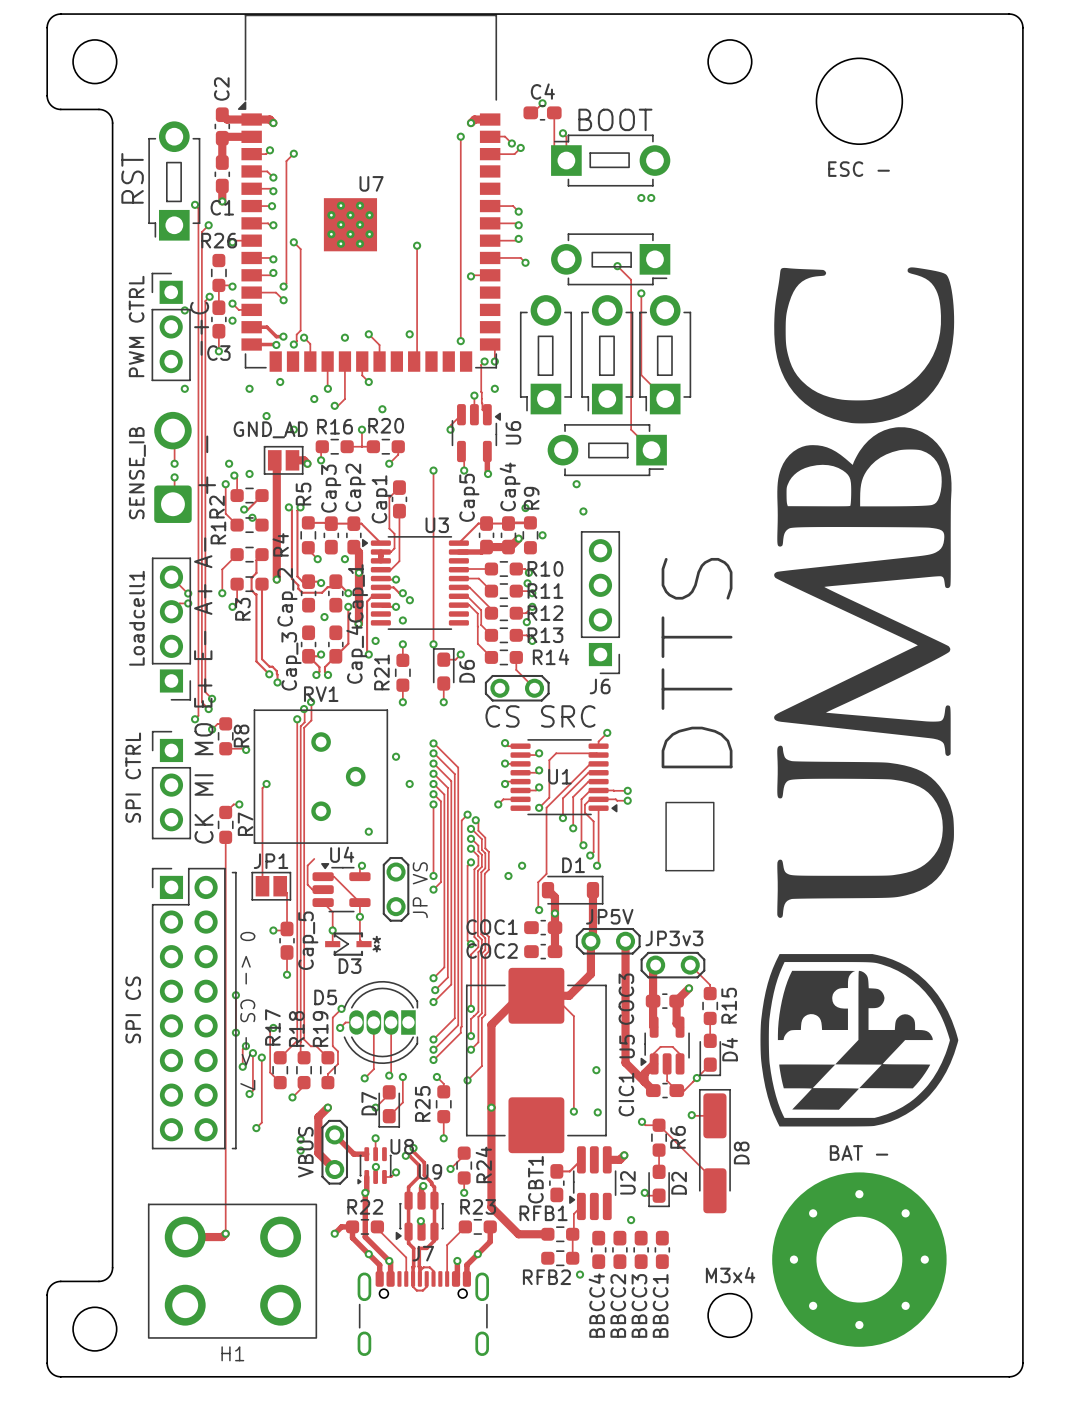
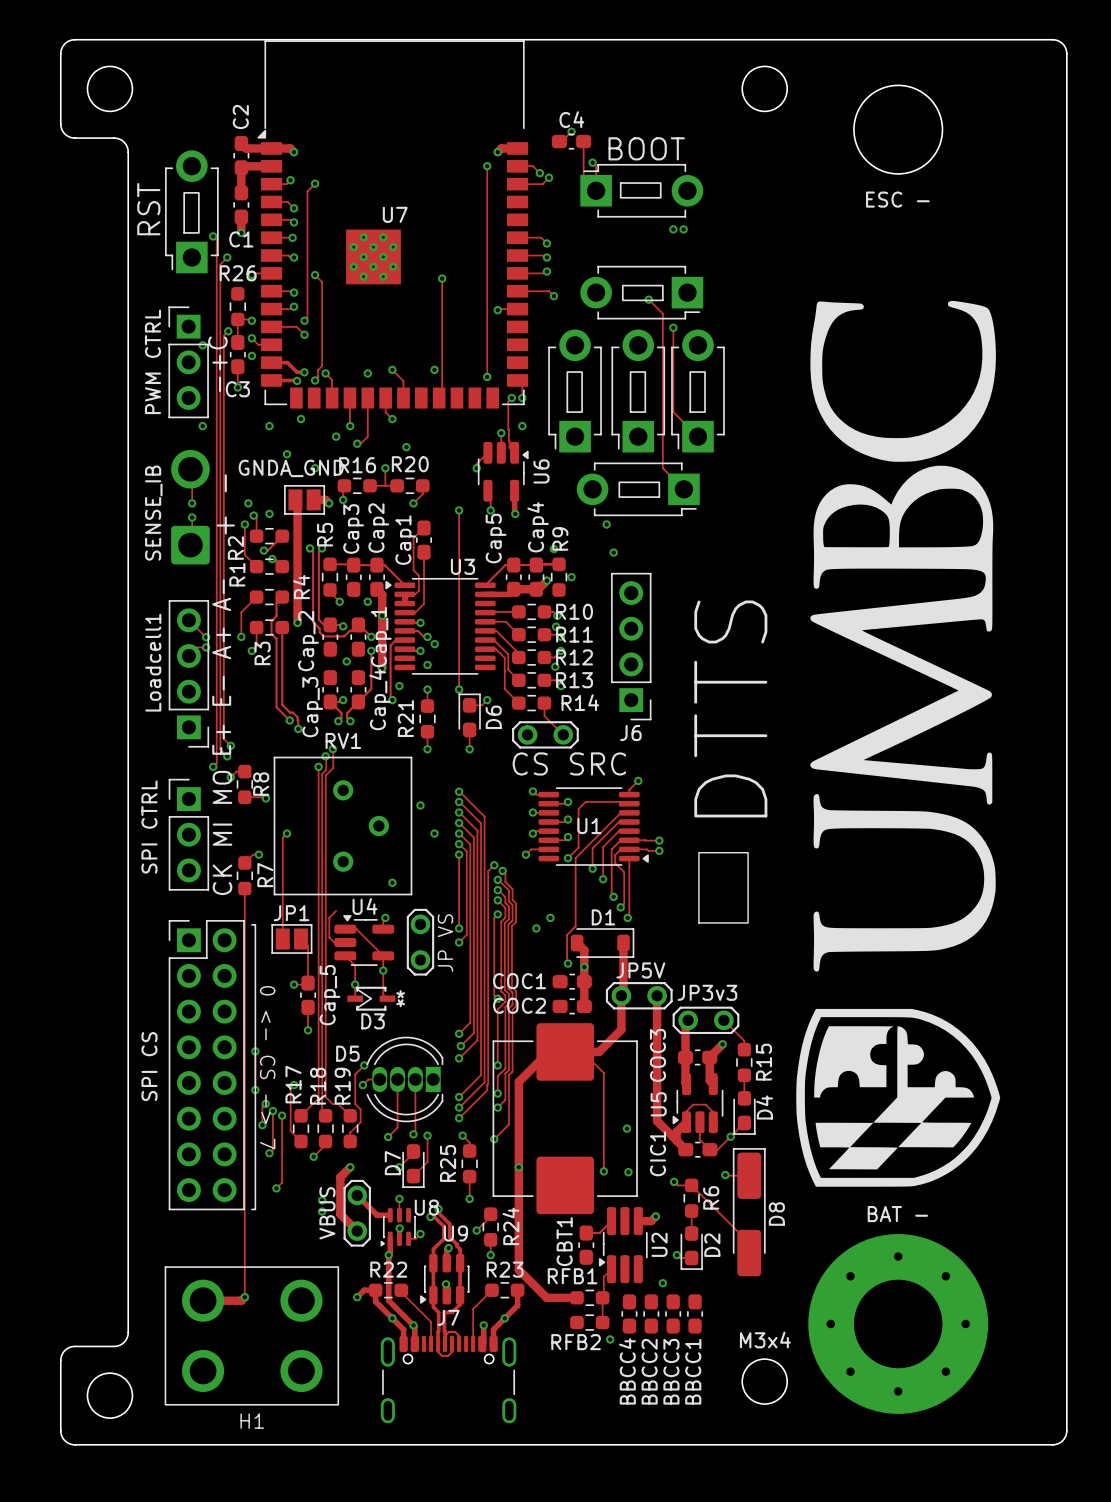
part value: GND_AD (270, 429) -> GNDA_GND (291, 468)

